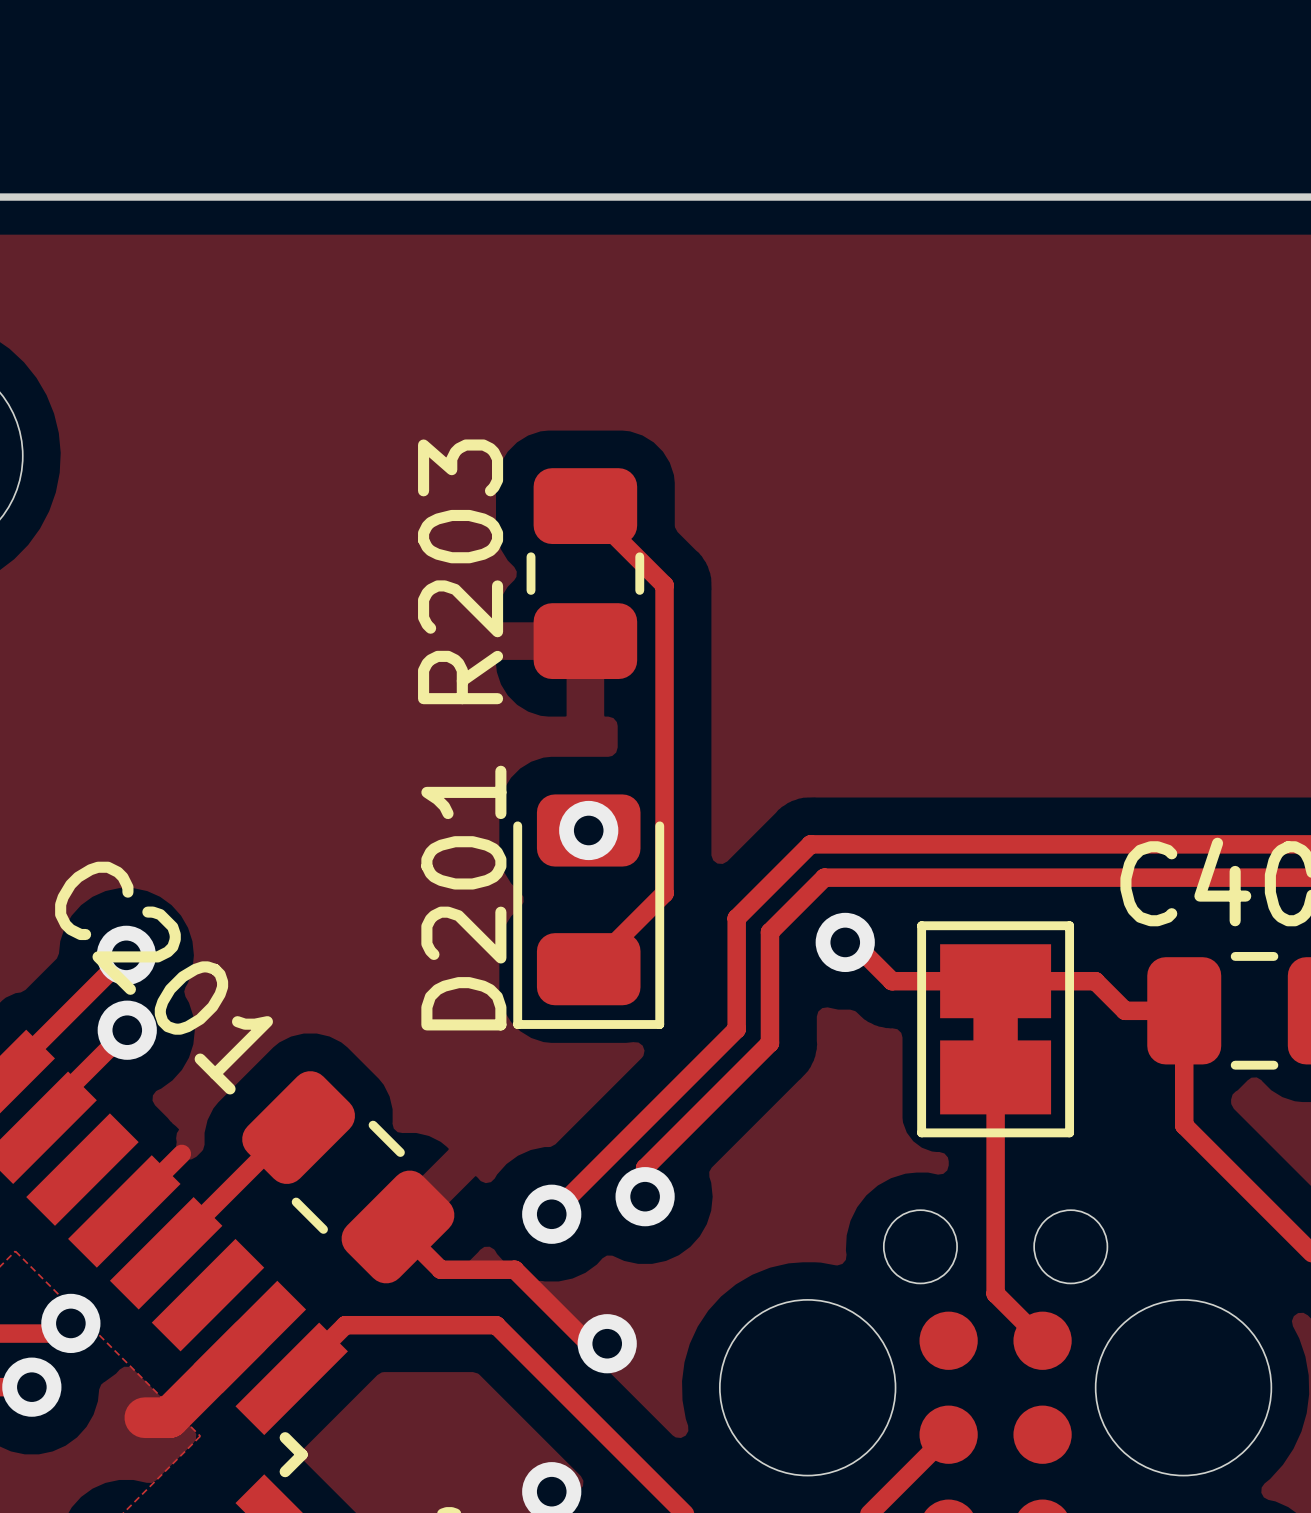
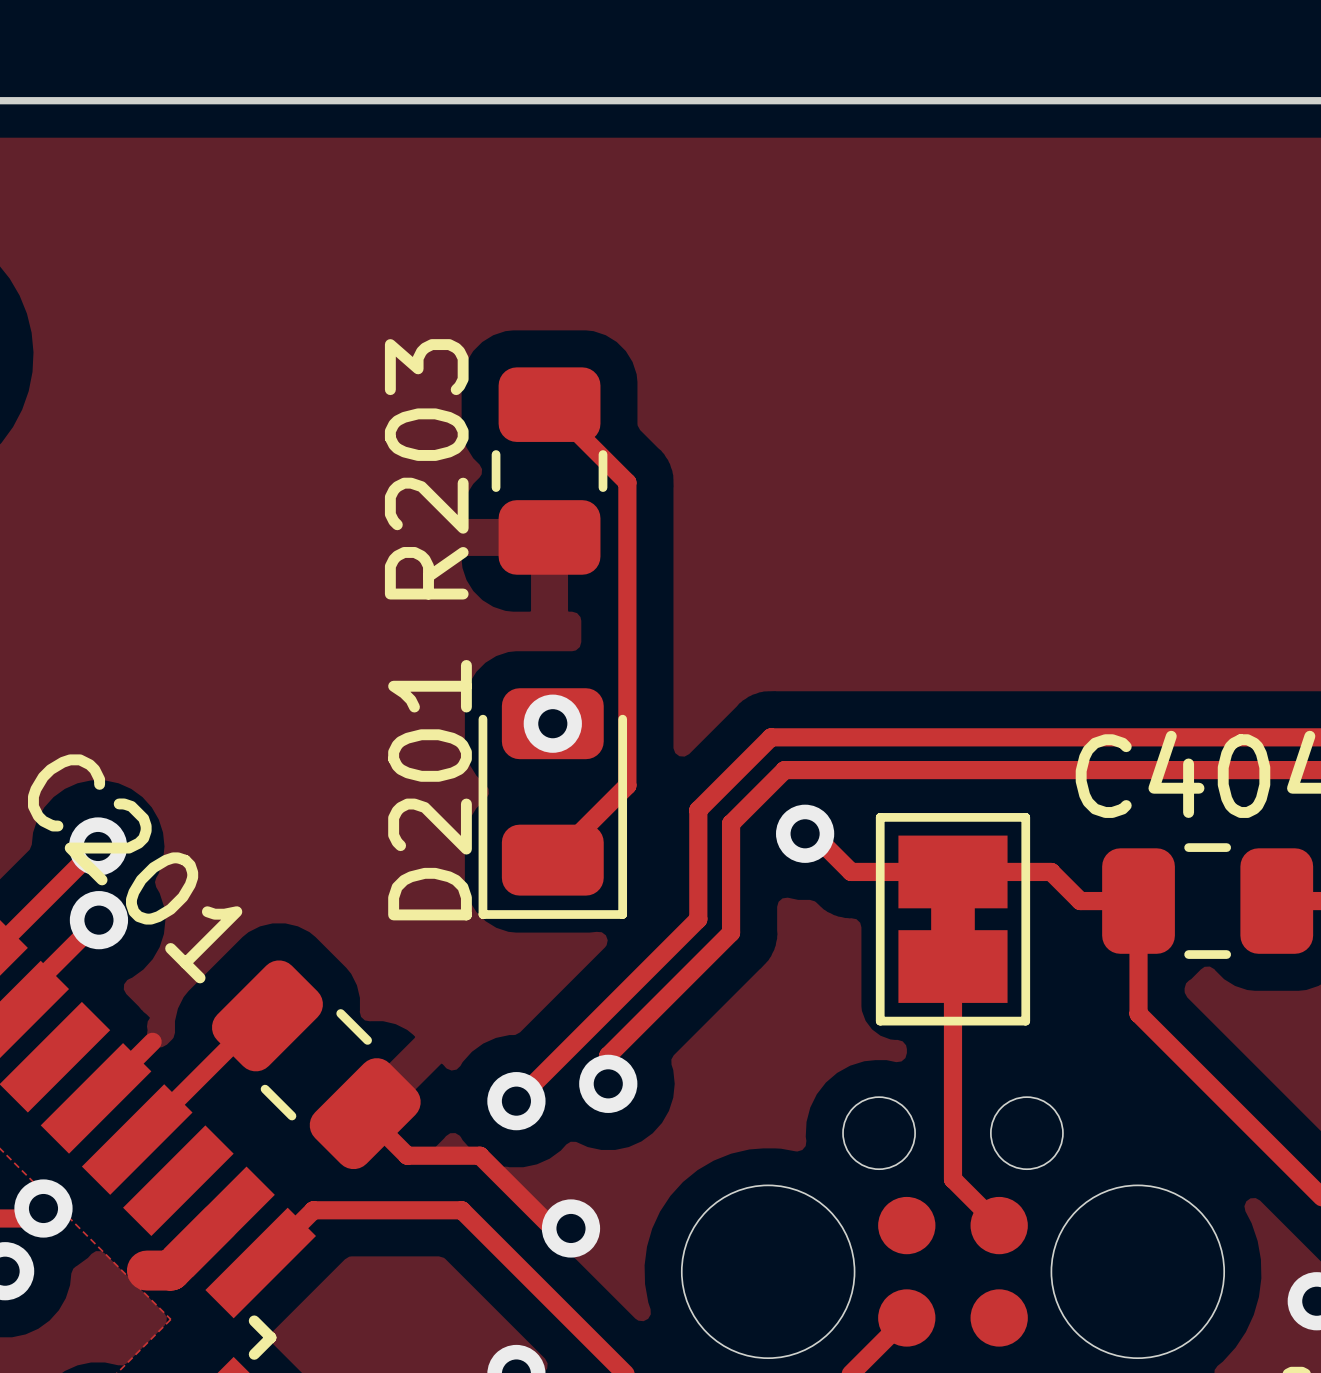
track: (200, 1386) (169, 1417) (144, 1417) -> (170, 1270) (146, 1270)

